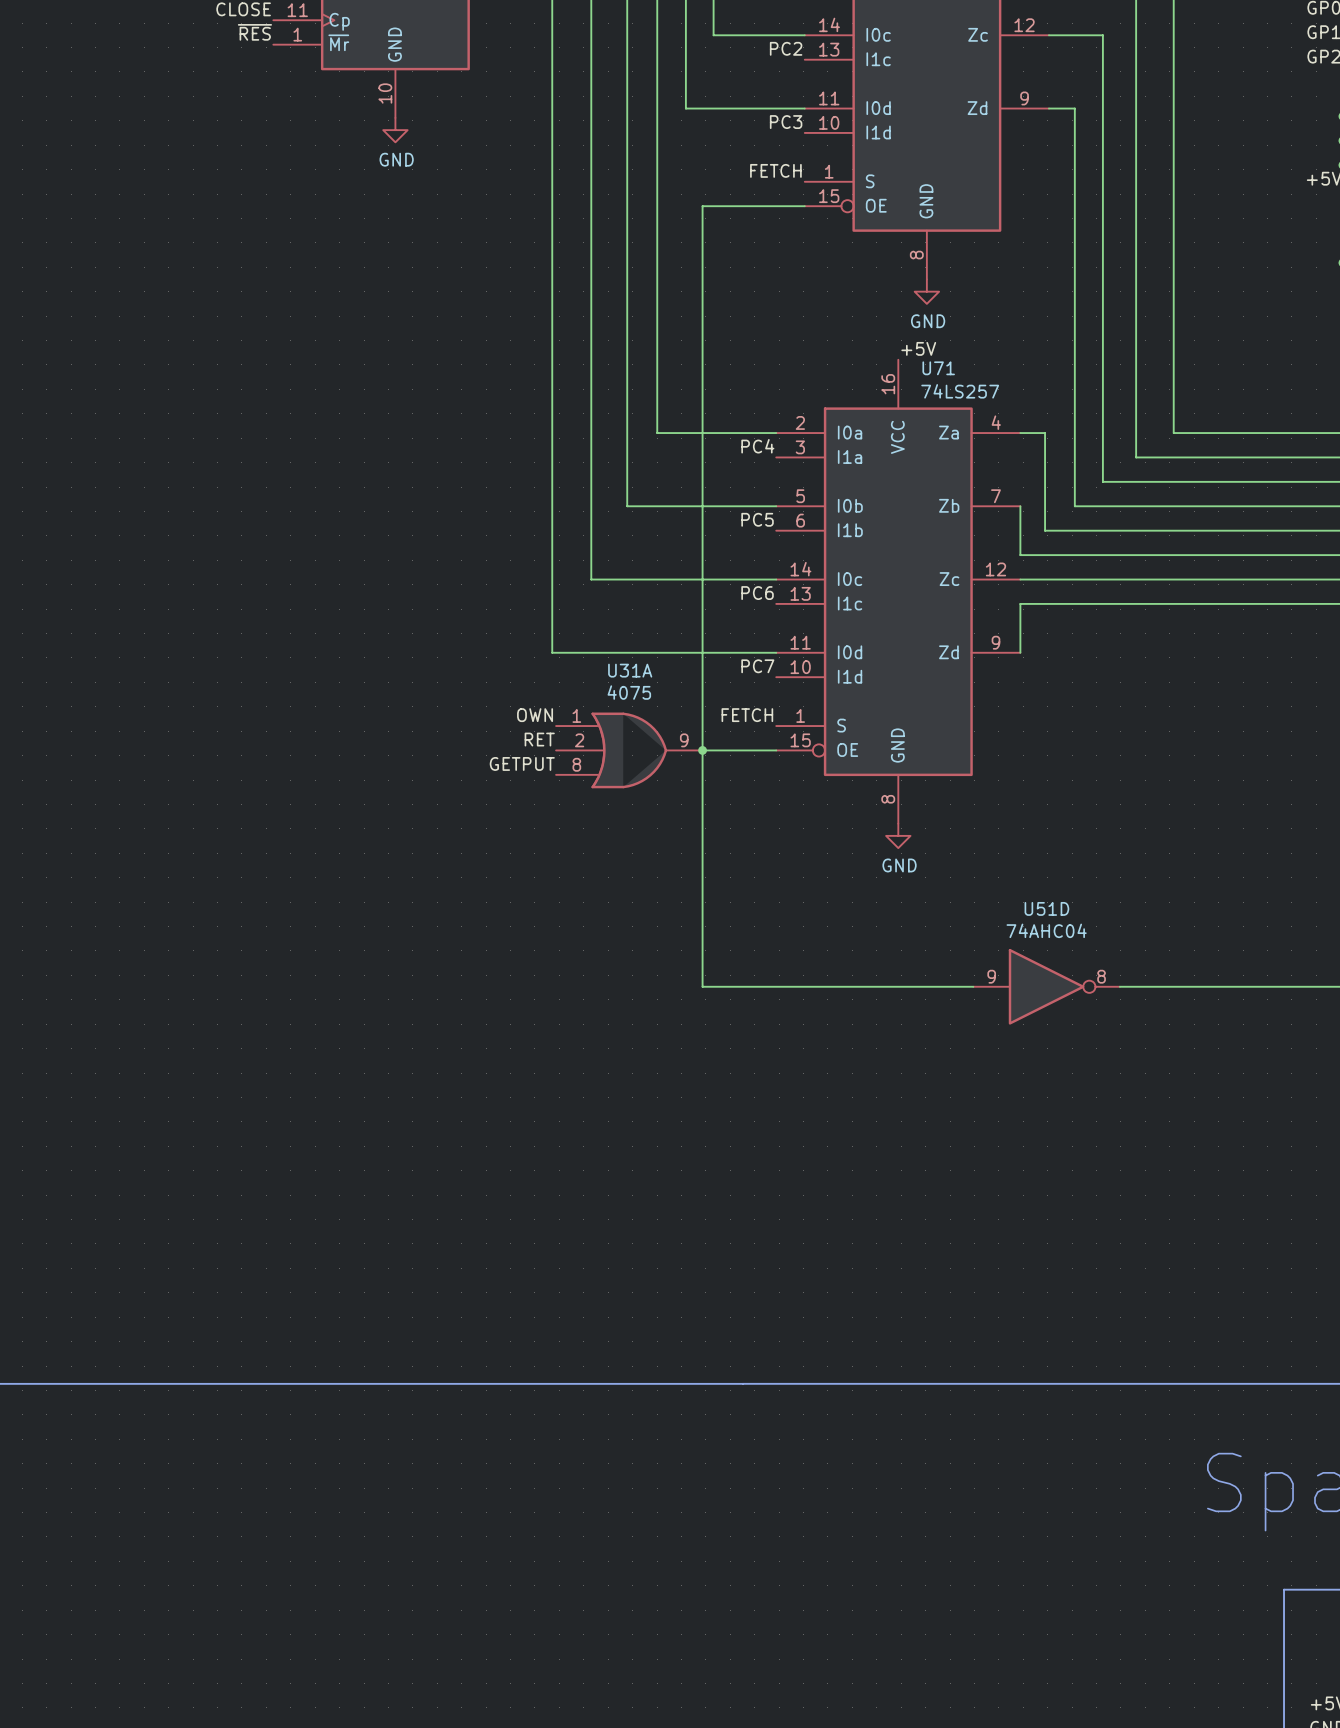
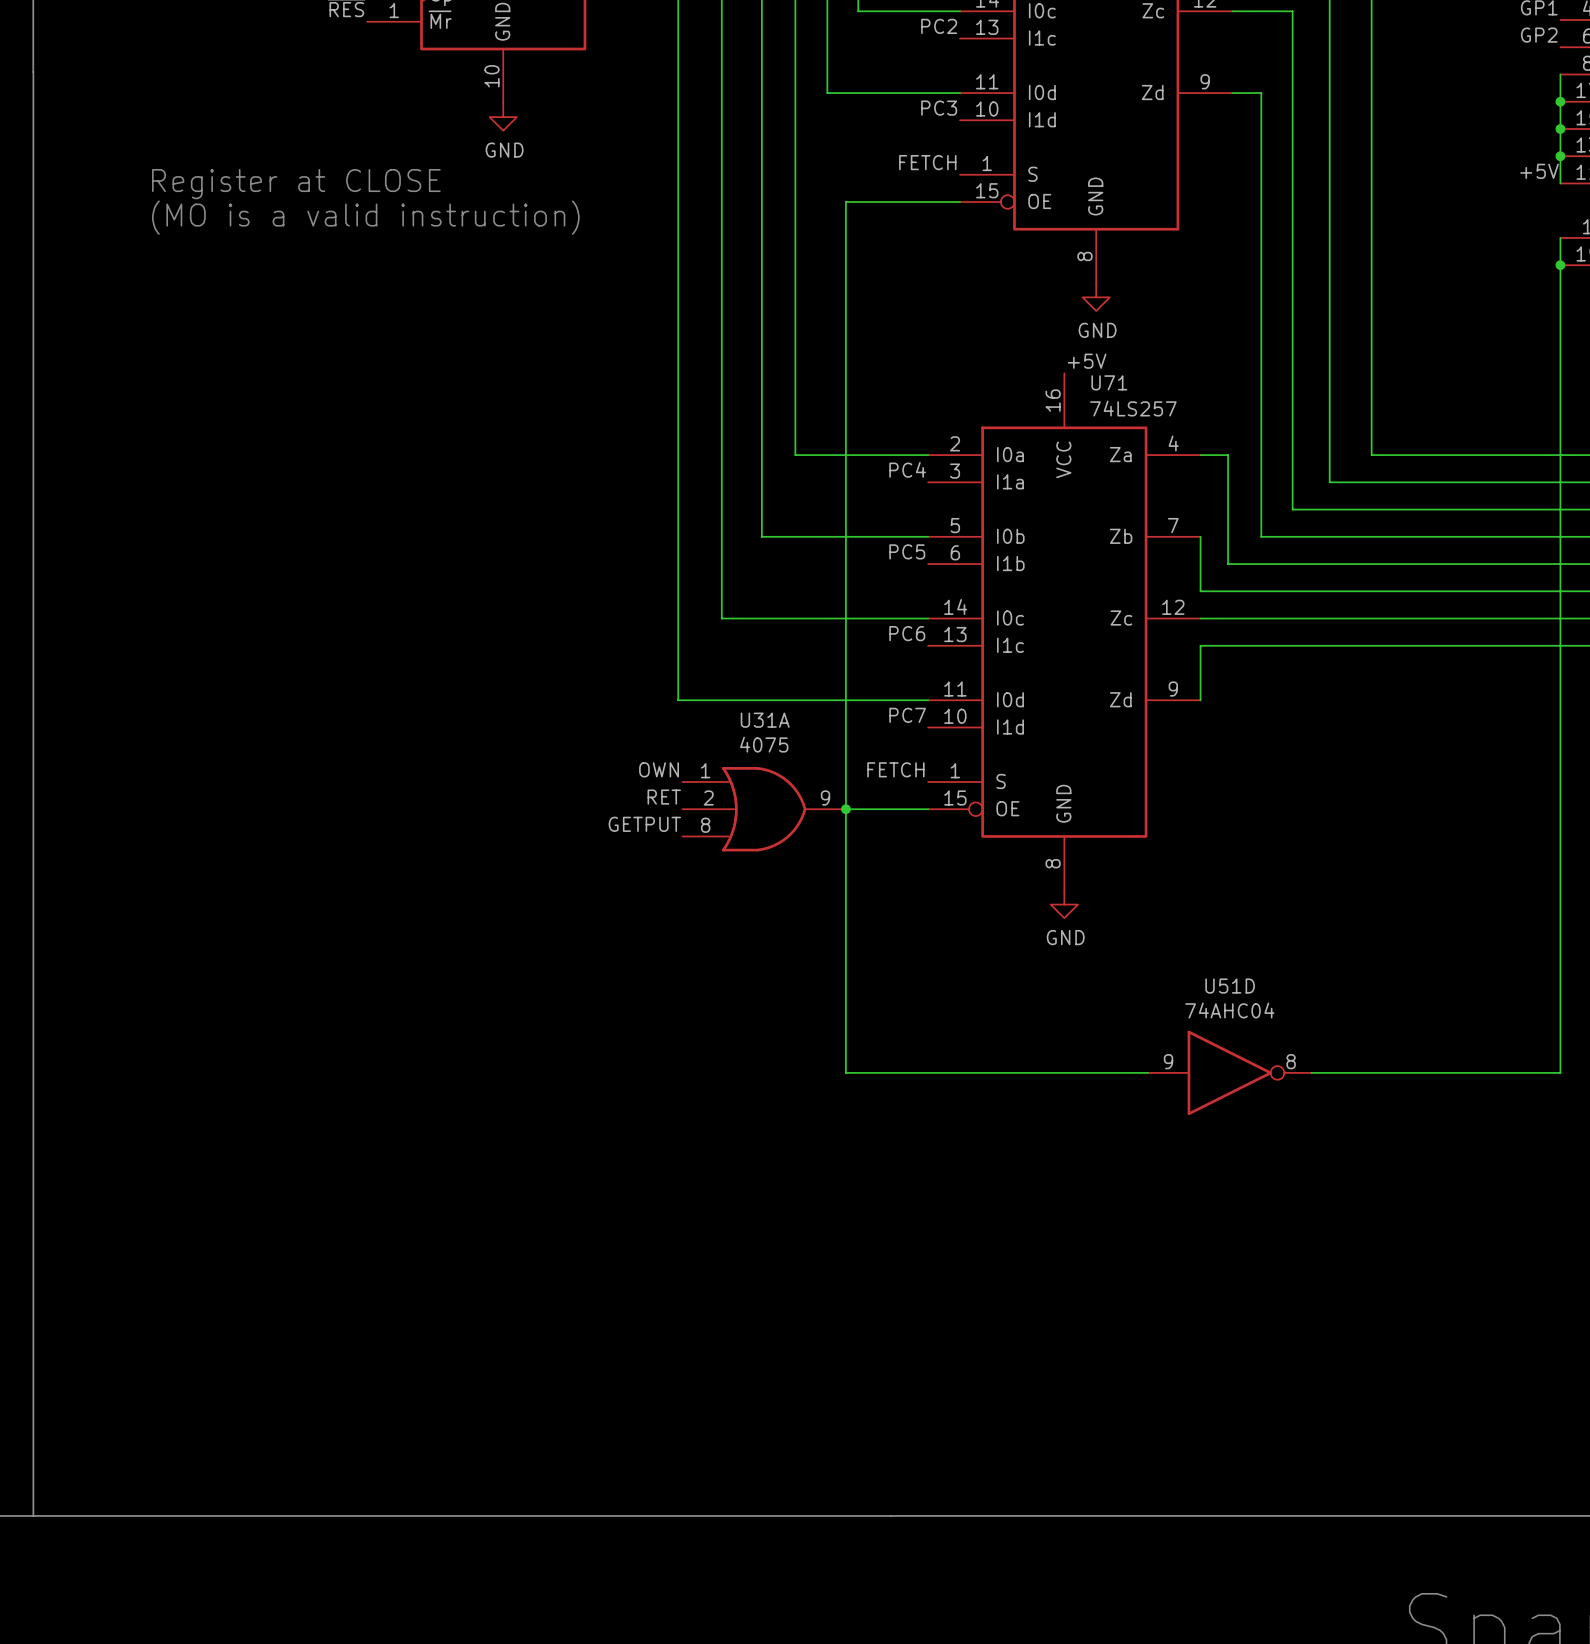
text: none -> Register at CLOSE (296, 184)
text: none -> (MO is a valid instruction) (365, 217)

